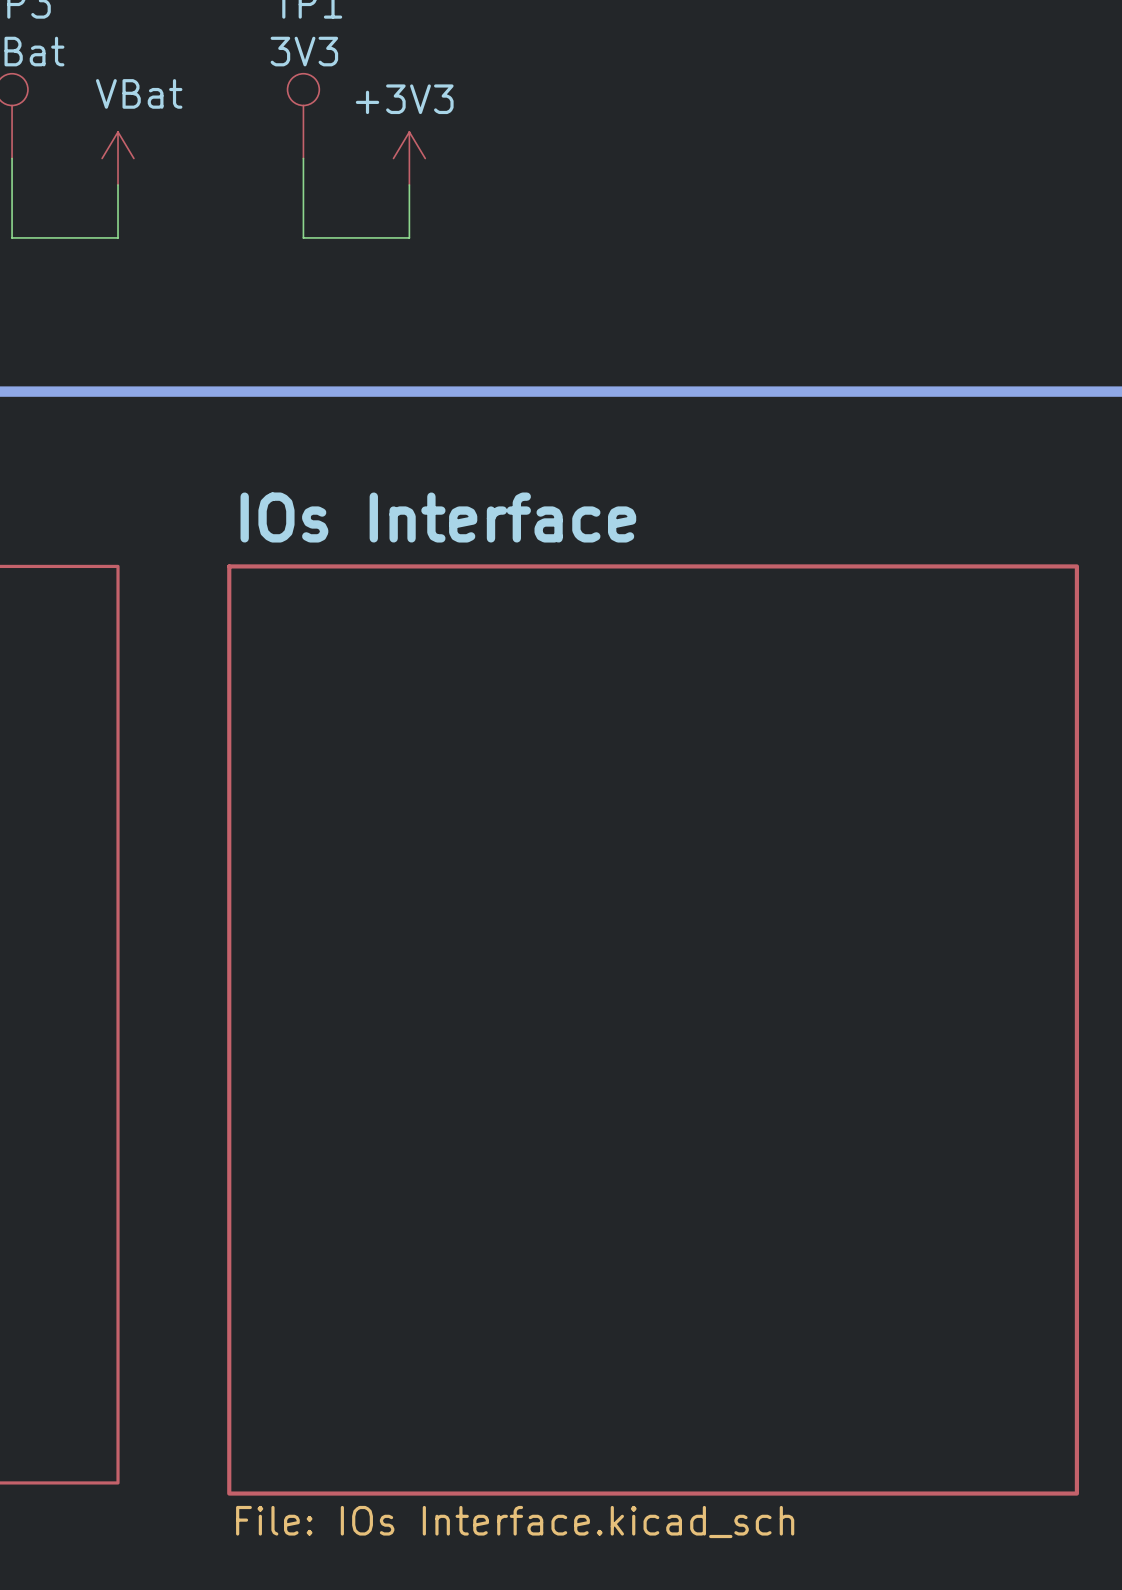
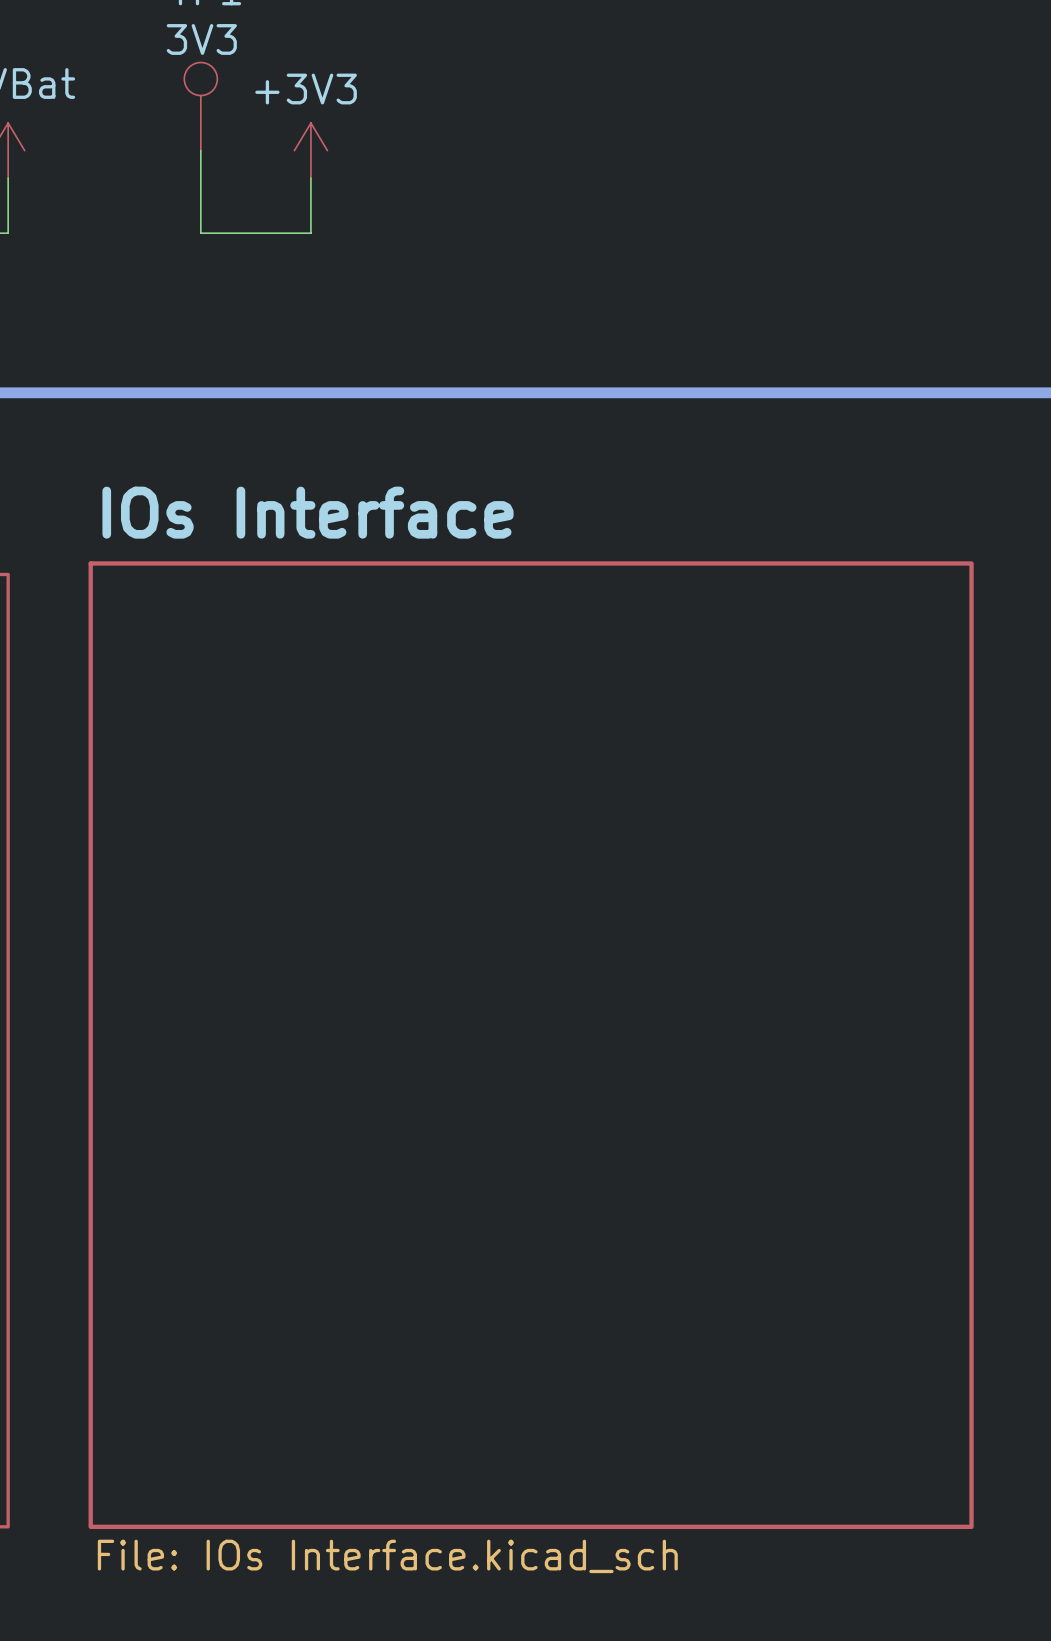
sheet IOs Interface position: (653, 1029) -> (531, 1045)

